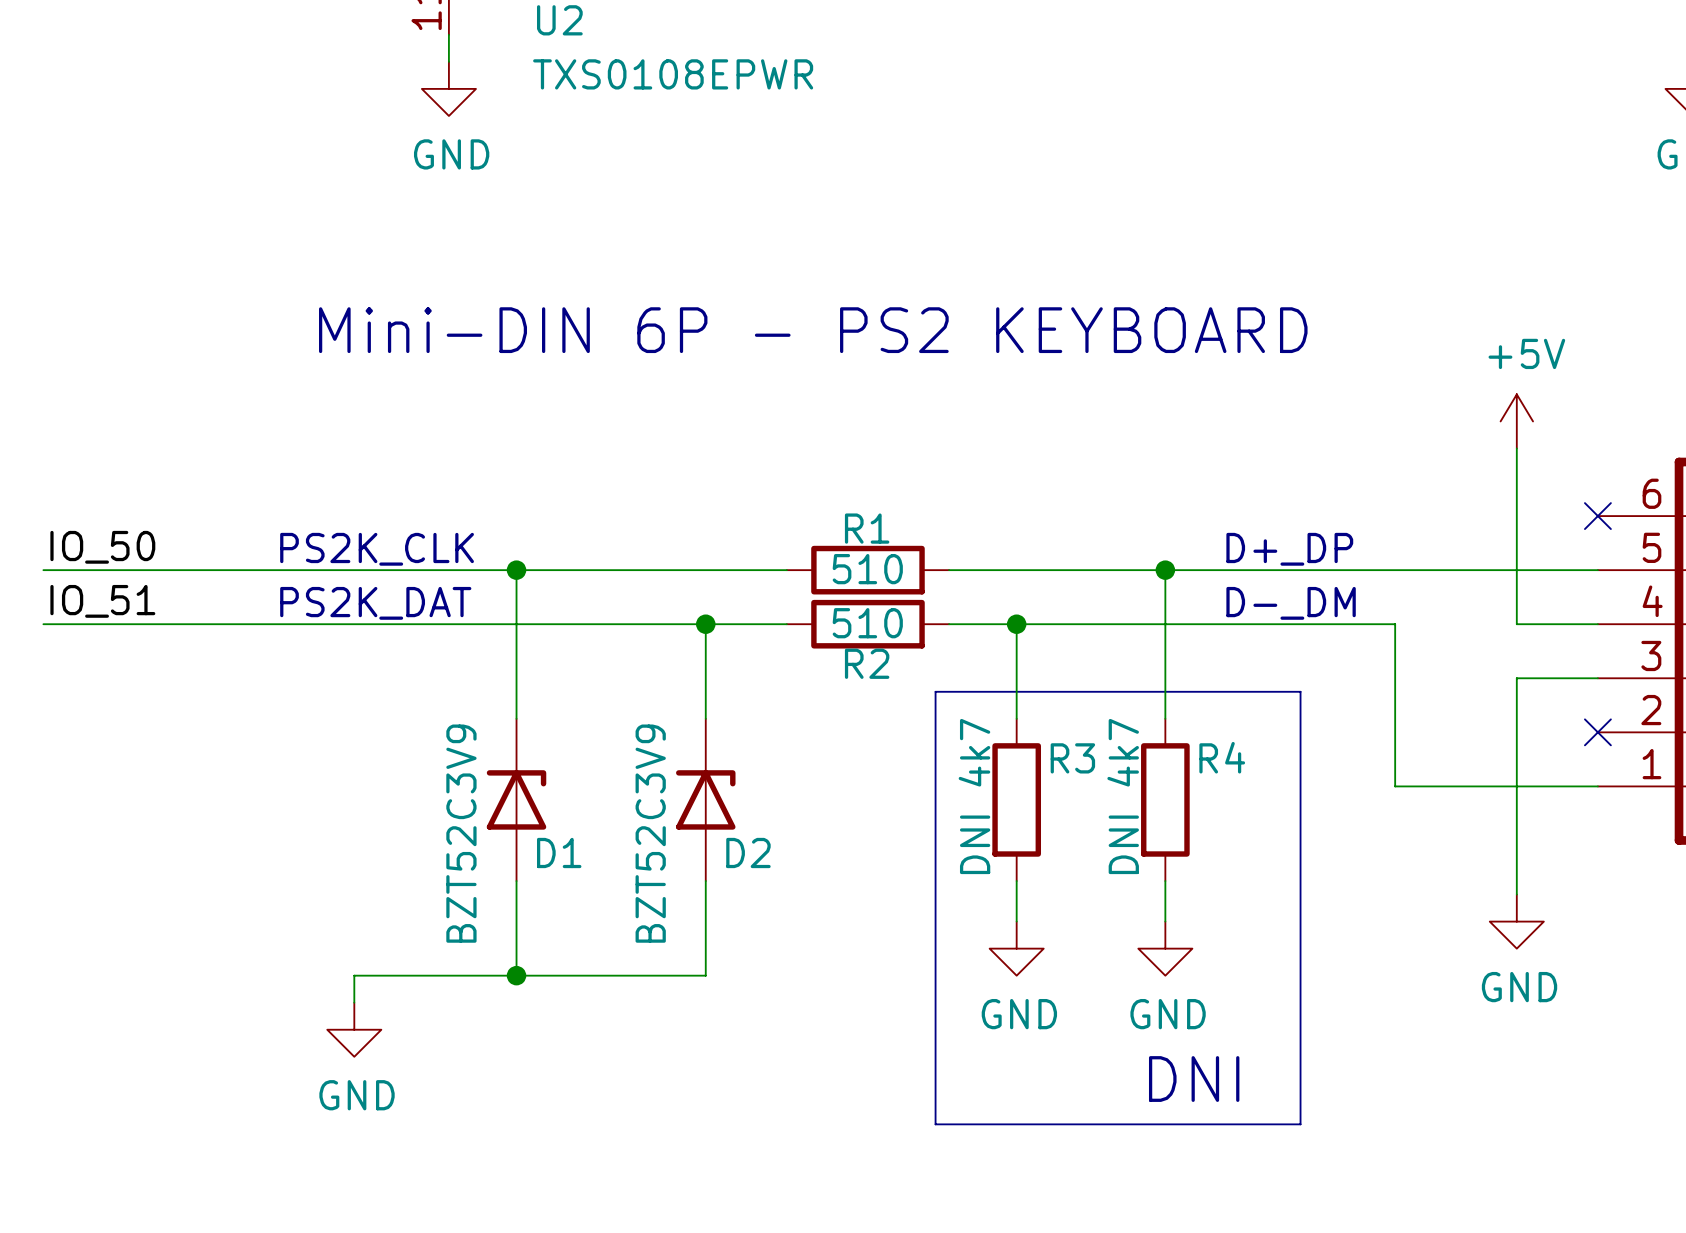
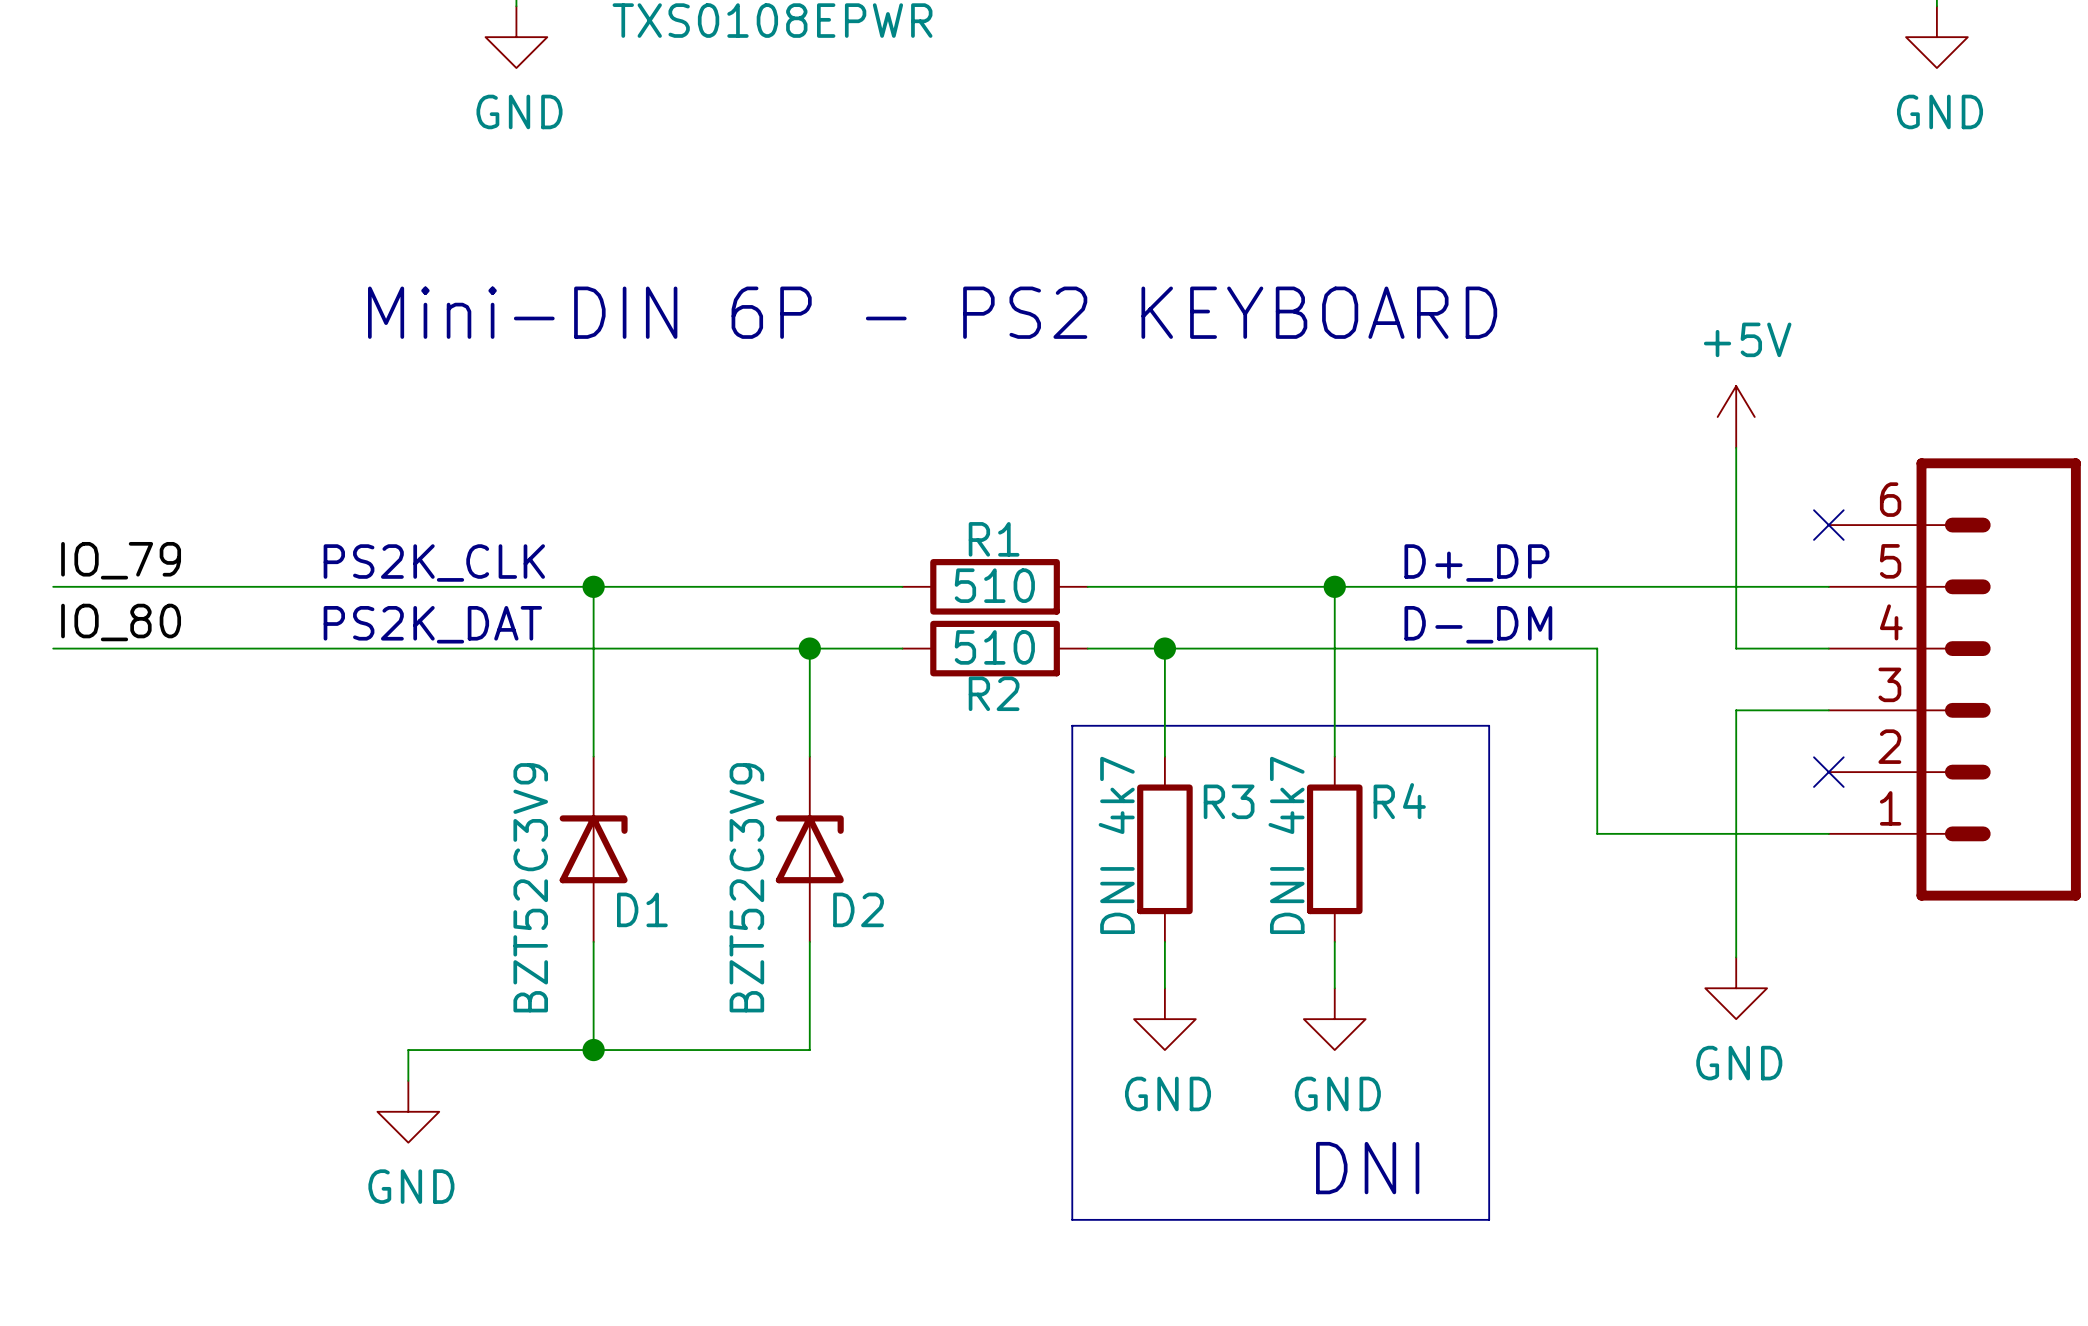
label: IO_50 (102, 547) -> IO_79 (121, 560)
label: IO_51 (102, 601) -> IO_80 (121, 622)

